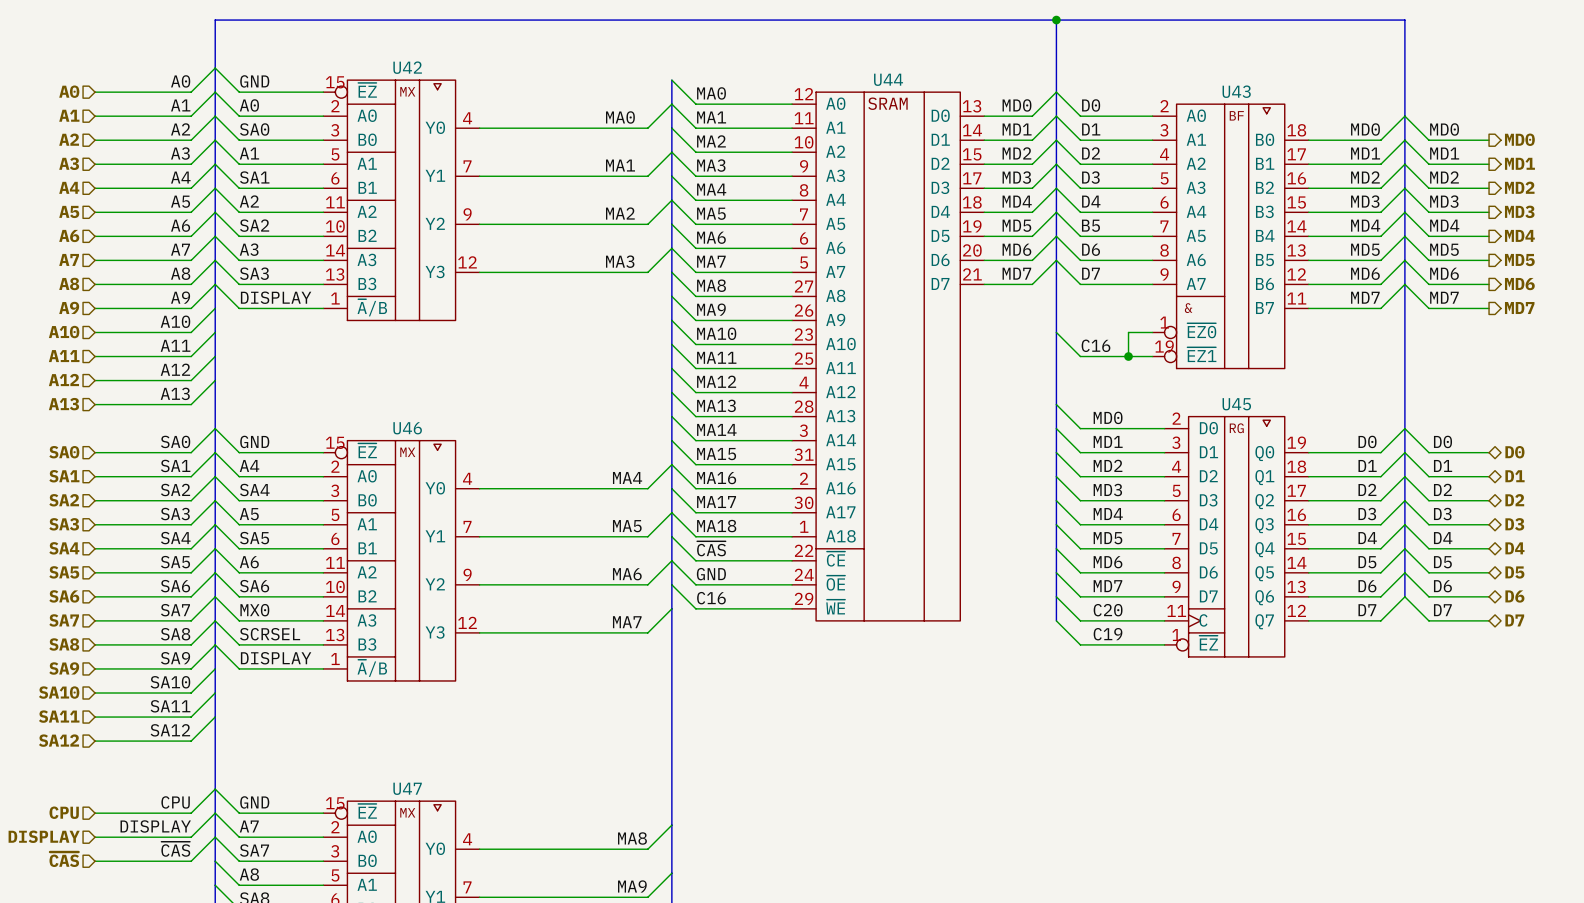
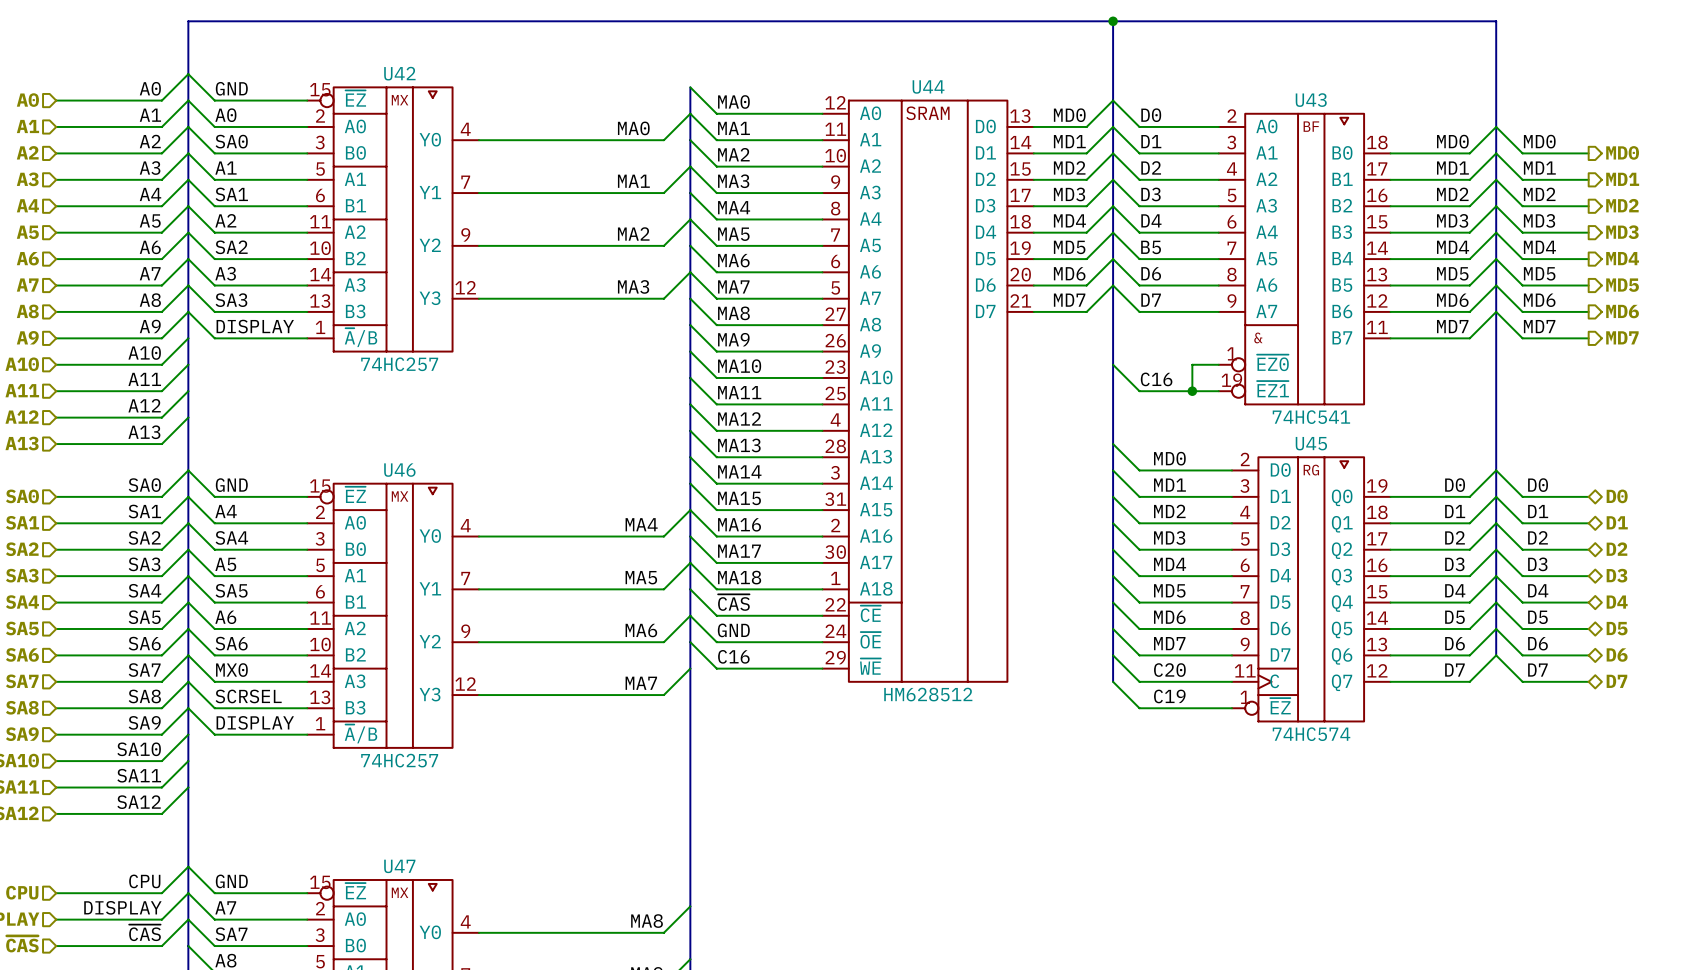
U42 value: none -> 74HC257 (399, 364)
U43 value: none -> 74HC541 (1311, 417)
U44 value: none -> HM628512 (928, 694)
U45 value: none -> 74HC574 (1311, 734)
U46 value: none -> 74HC257 (399, 760)

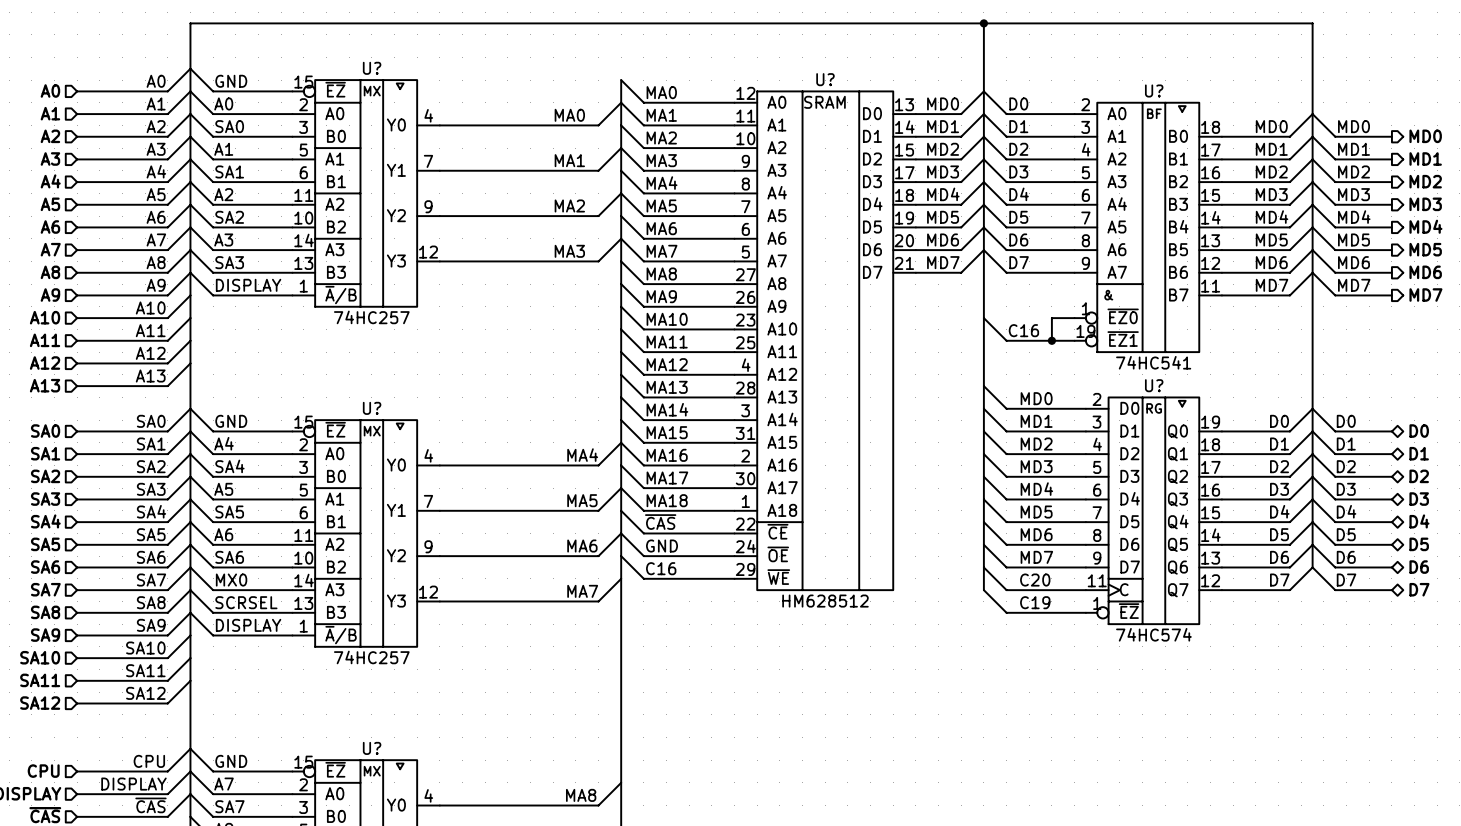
U42 name: U42 (399, 73) -> U? (372, 68)
U44 name: U44 (928, 86) -> U? (825, 79)
U43 name: U43 (1311, 100) -> U? (1154, 90)
label: В5 (1151, 247) -> D5 (1018, 217)
U45 name: U45 (1311, 443) -> U? (1154, 385)
U46 name: U46 (399, 470) -> U? (372, 408)
U47 name: U47 (399, 866) -> U? (372, 748)

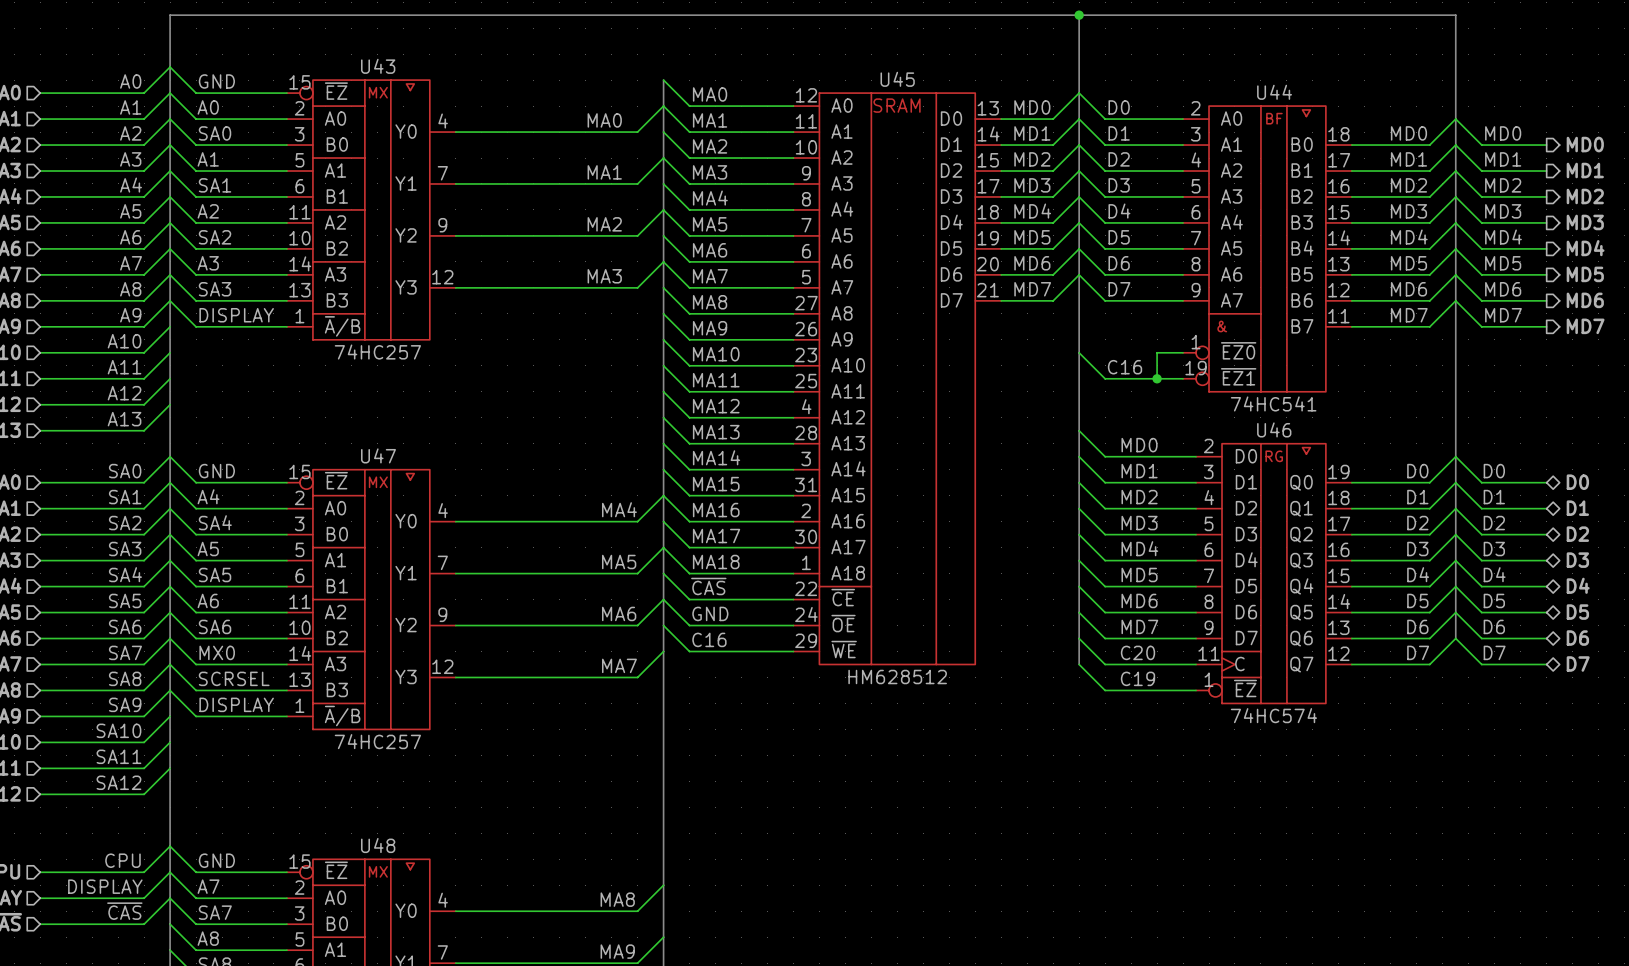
U? name: U? (372, 68) -> U43 (378, 66)
U? name: U? (825, 79) -> U45 (897, 79)
U? name: U? (1154, 90) -> U44 (1274, 92)
U? name: U? (1154, 385) -> U46 (1274, 429)
U? name: U? (372, 408) -> U47 (378, 455)
U? name: U? (372, 748) -> U48 (378, 845)

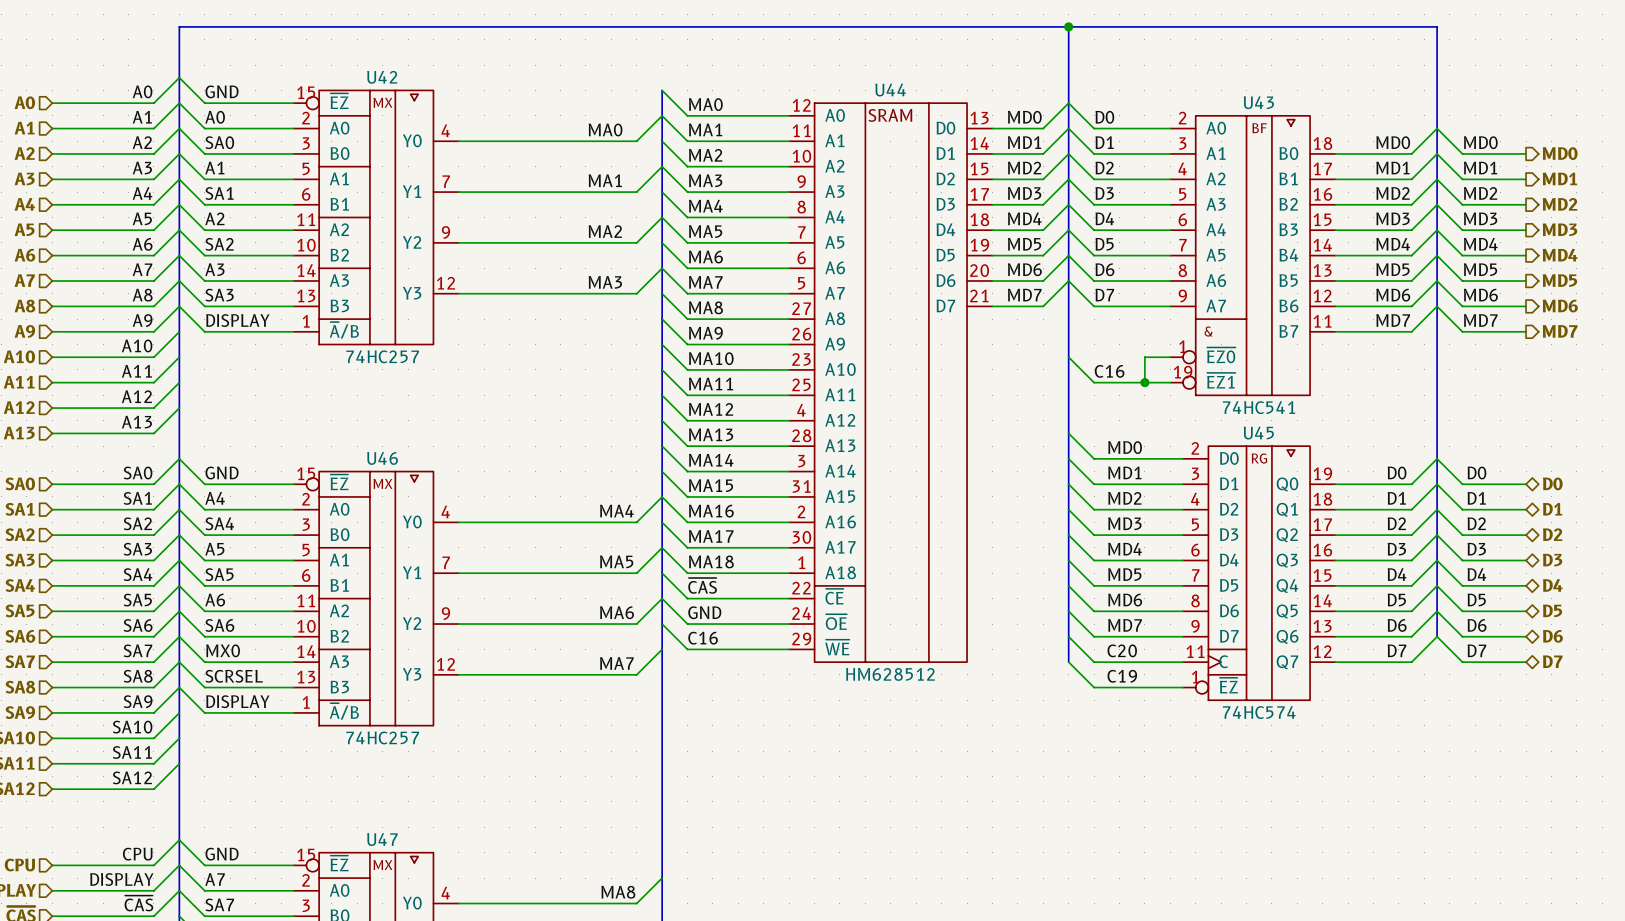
U43 name: U43 (378, 66) -> U42 (382, 77)
U45 name: U45 (897, 79) -> U44 (890, 90)
U44 name: U44 (1274, 92) -> U43 (1258, 102)
U46 name: U46 (1274, 429) -> U45 (1258, 433)
U47 name: U47 (378, 455) -> U46 (382, 458)
U48 name: U48 (378, 845) -> U47 (382, 839)

